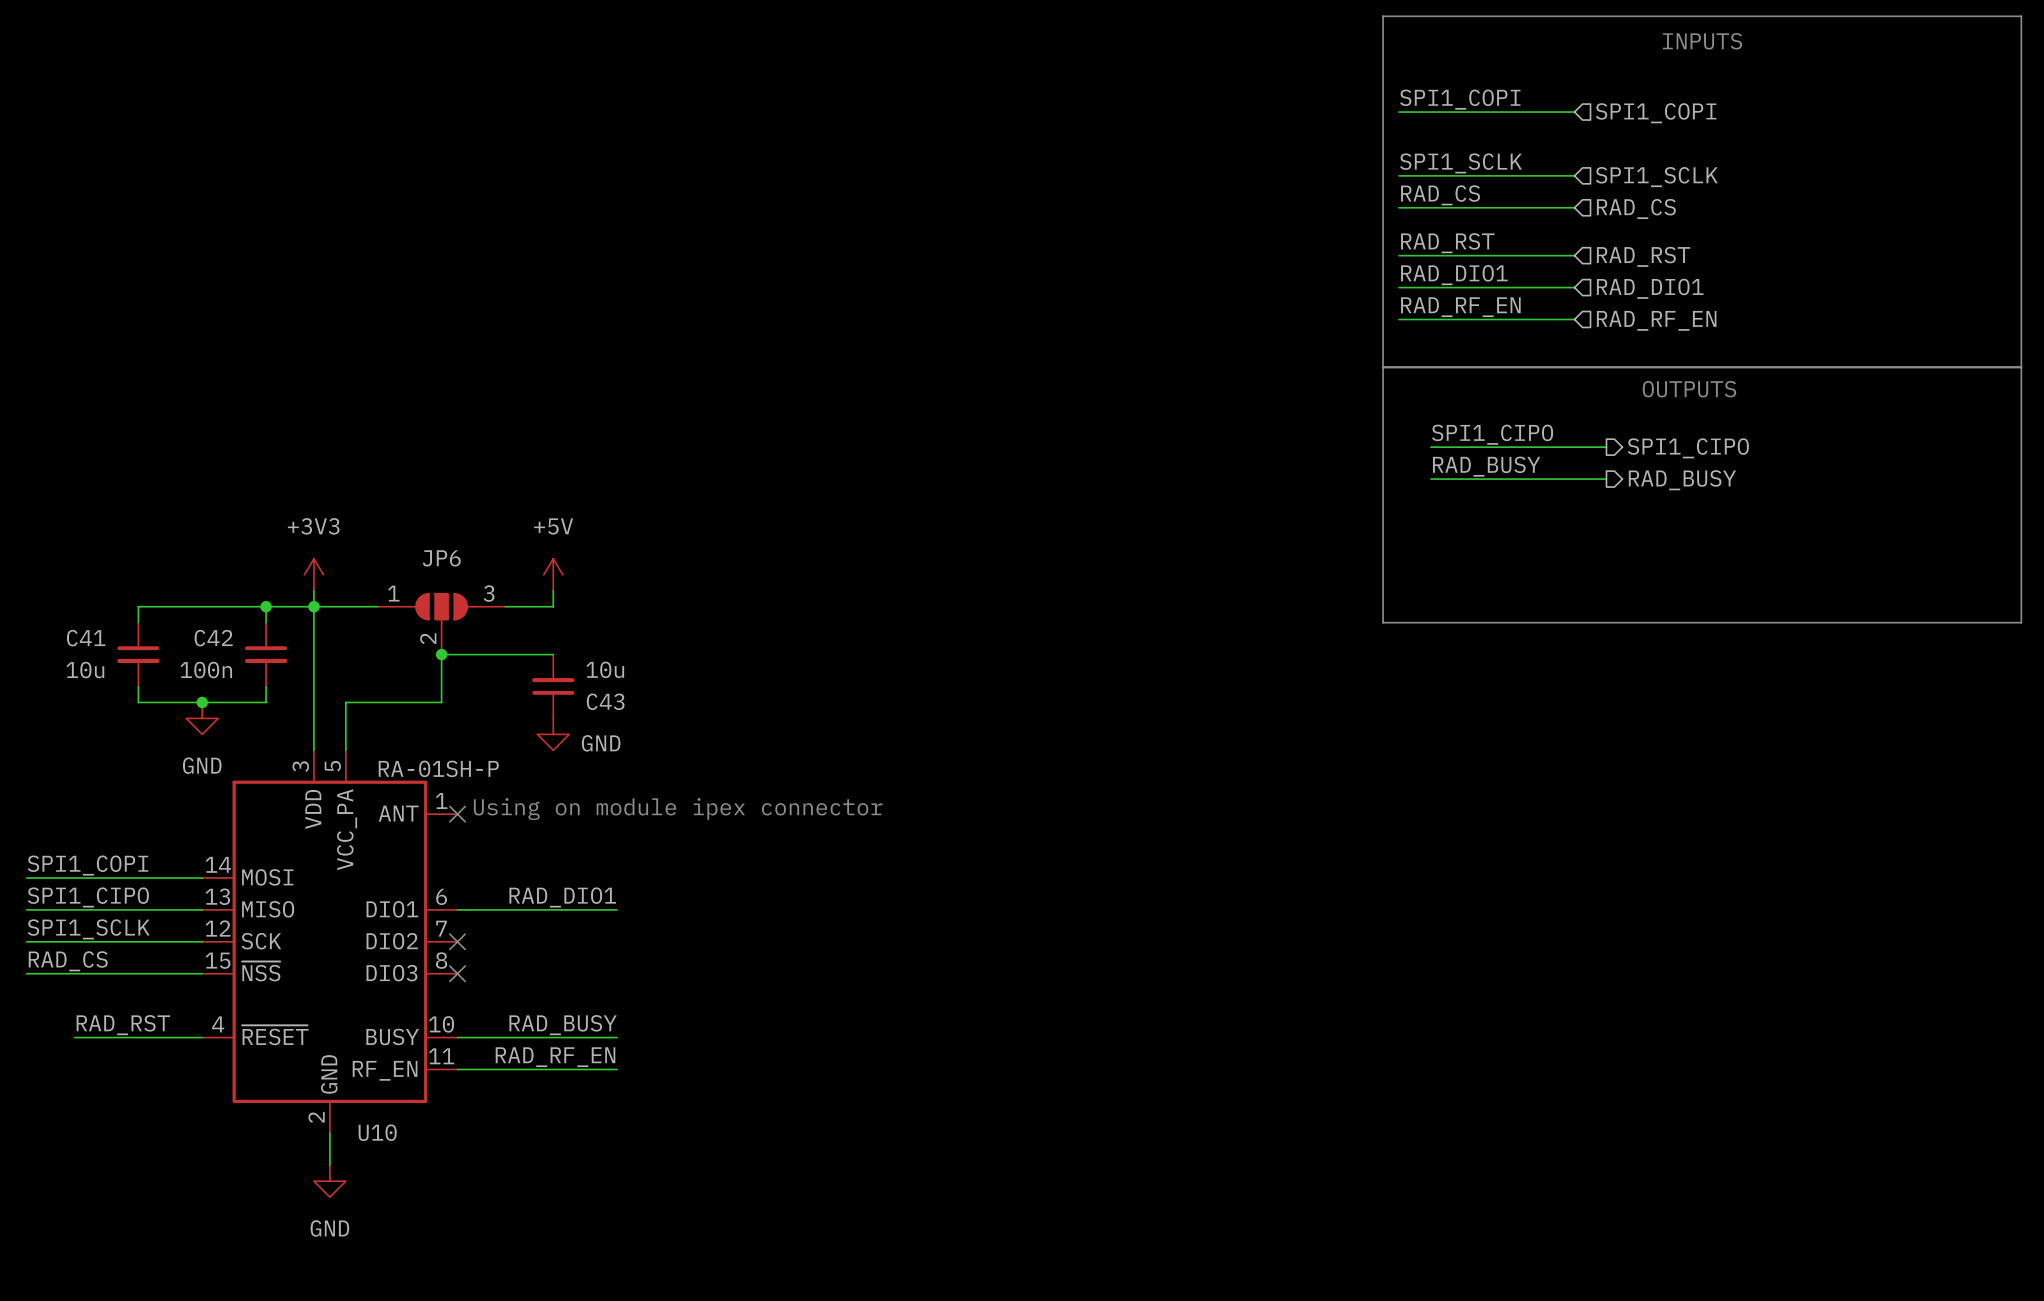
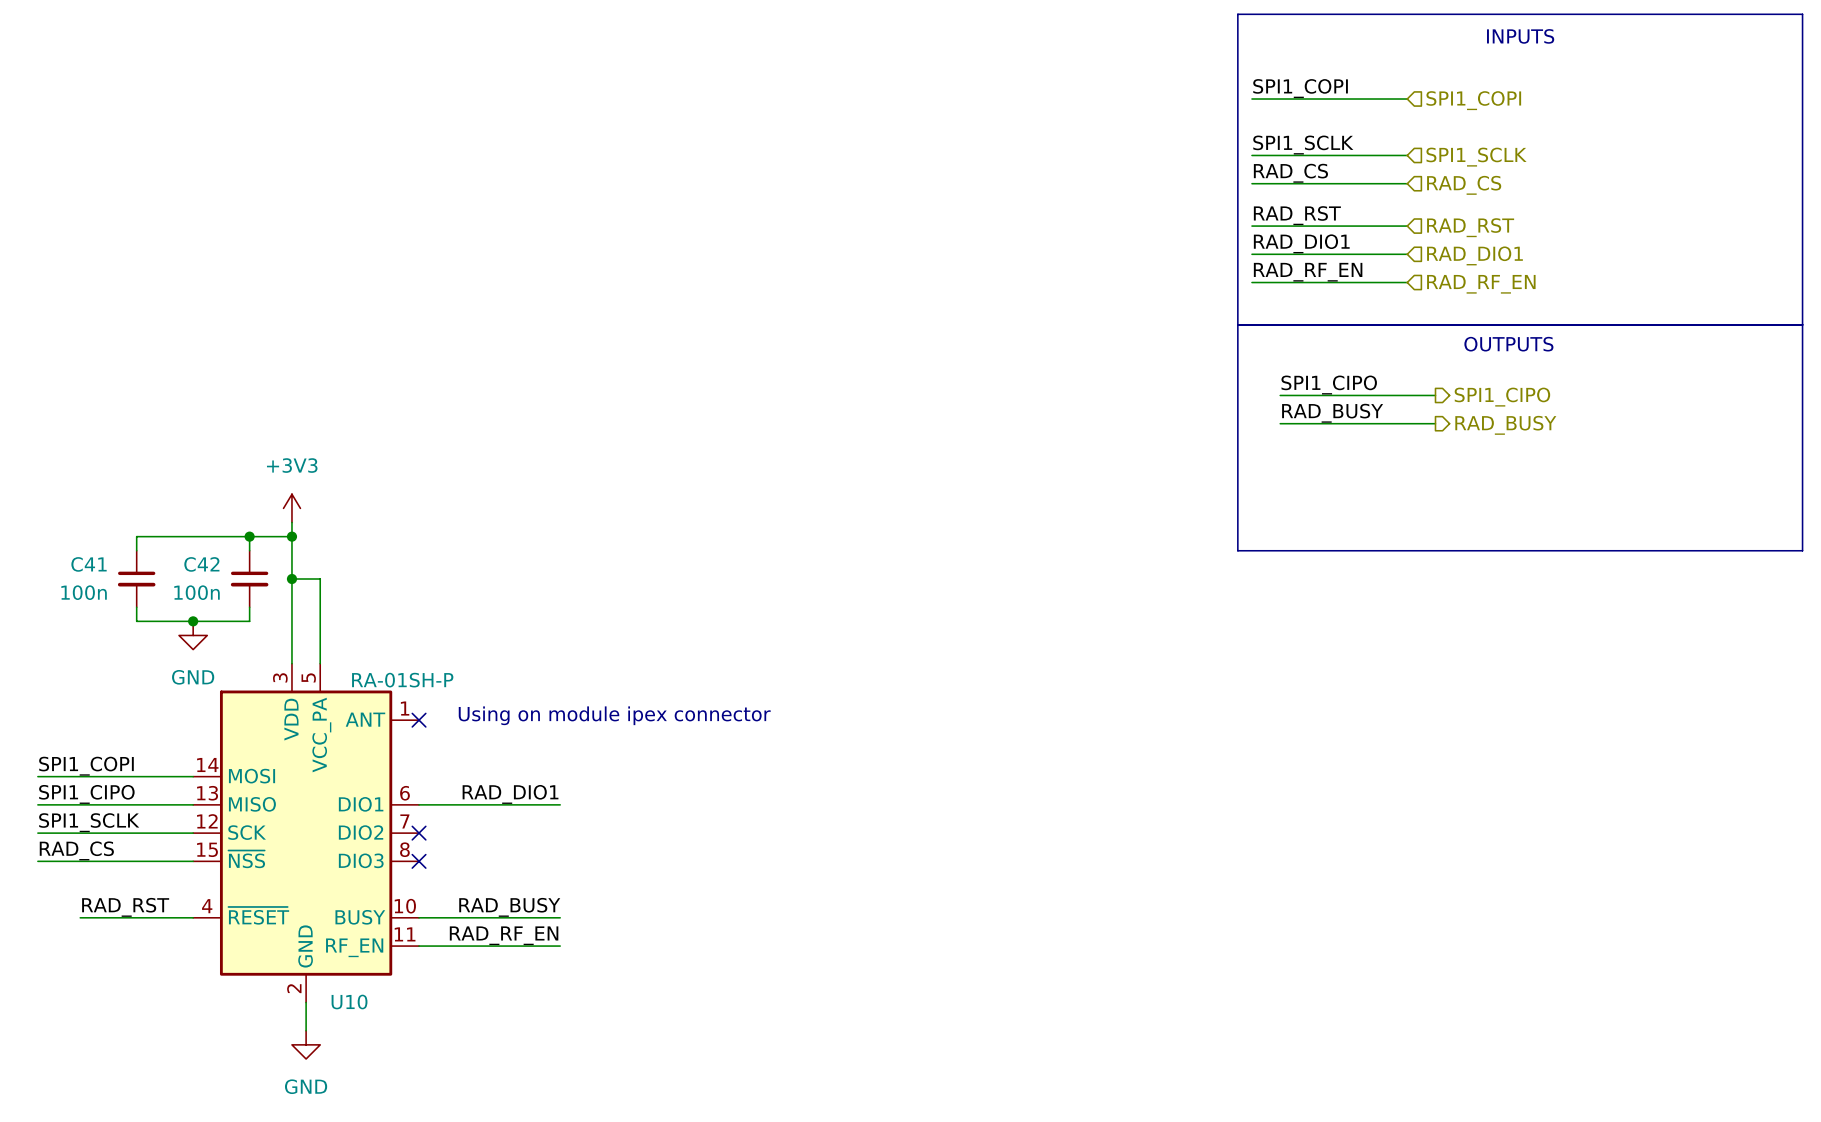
power symbol: +5V (553, 574) -> none
wire: (553, 590) (553, 606) (505, 606) -> none
wire: (313, 606) (377, 606) -> none
JP6: (441, 623) -> none
junction: none -> (291, 579)
junction: (441, 654) -> none
wire: (553, 654) (441, 654) (441, 702) (345, 702) -> (291, 579) (320, 579) (320, 621)
C41 value: 10u (85, 670) -> 100n (84, 592)
C43: 10u (553, 686) -> none
power symbol: GND (553, 734) -> none

